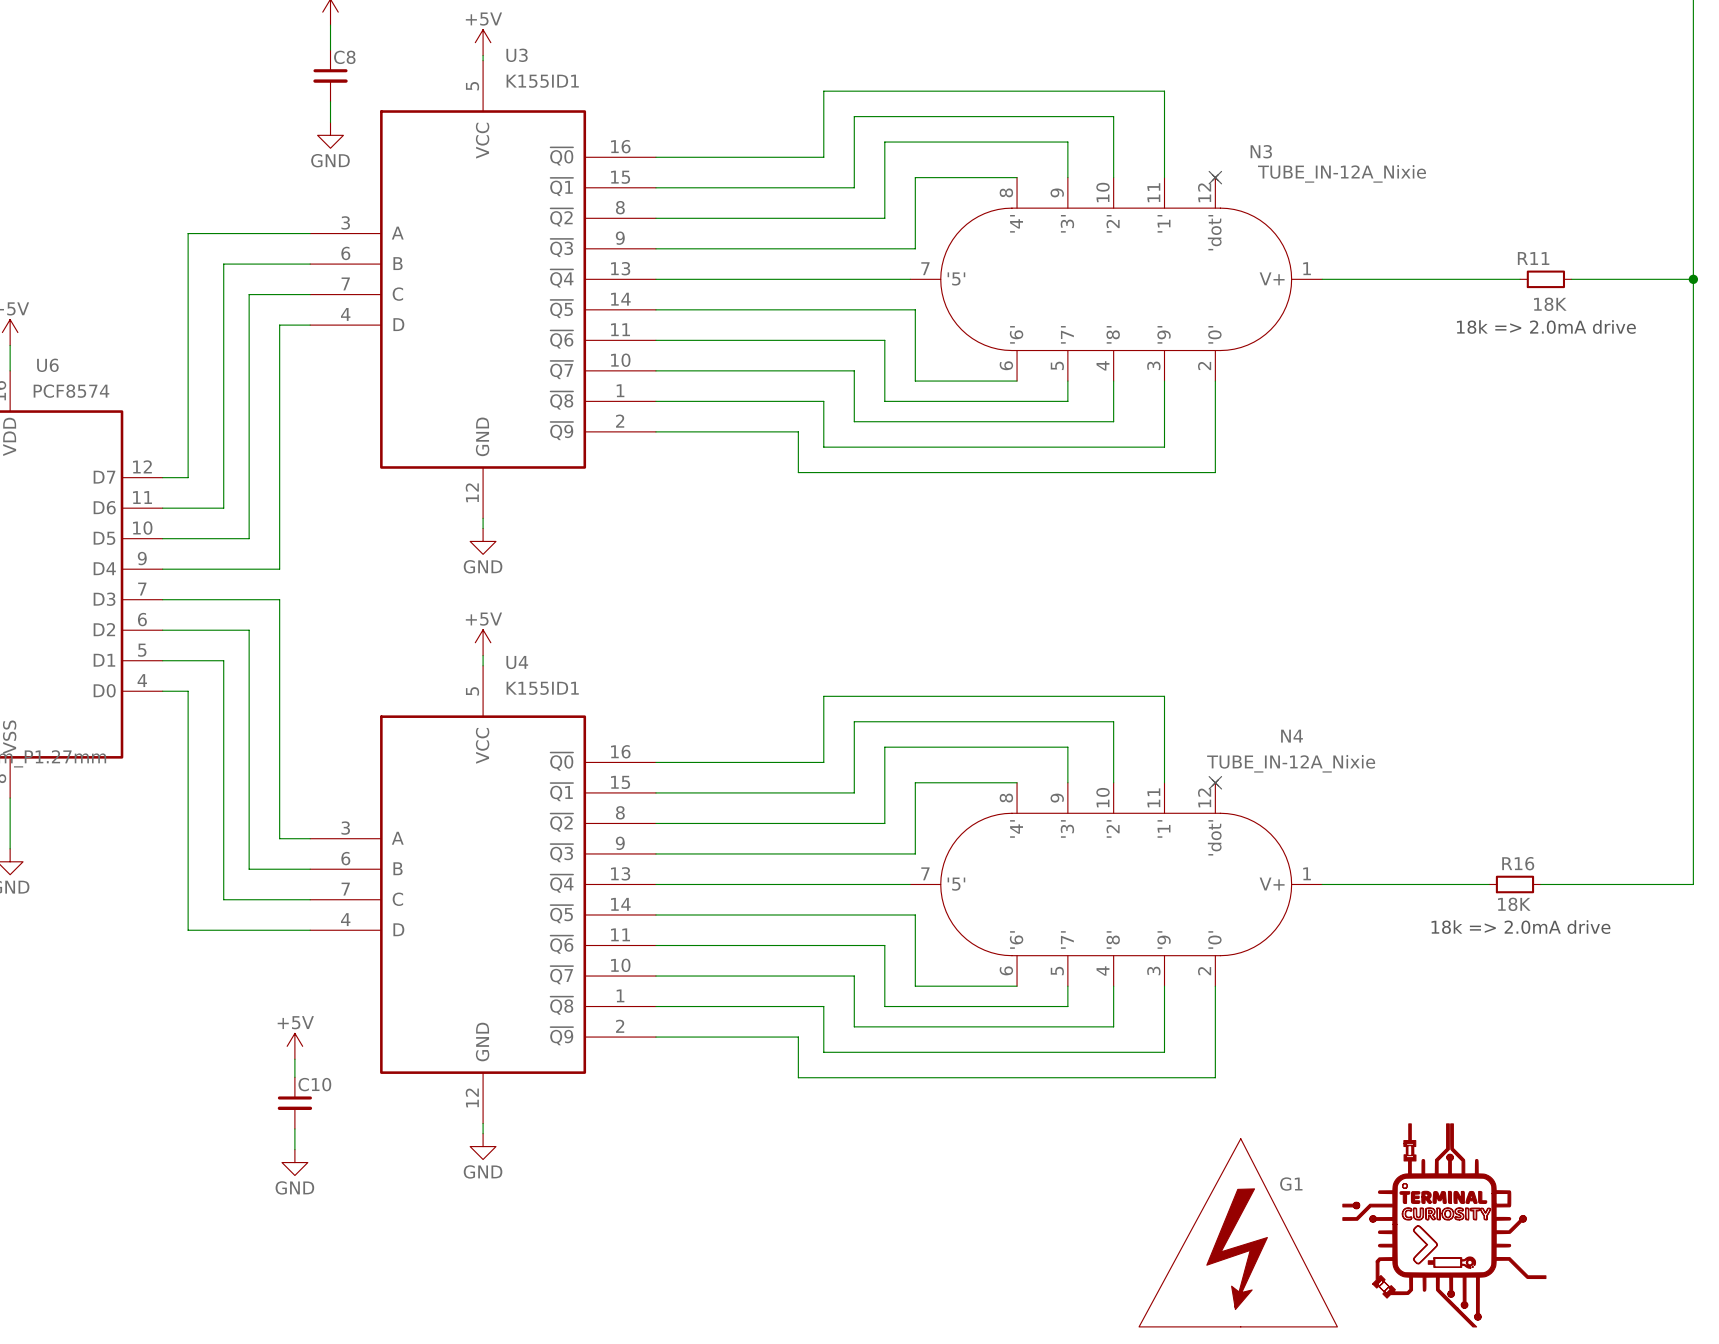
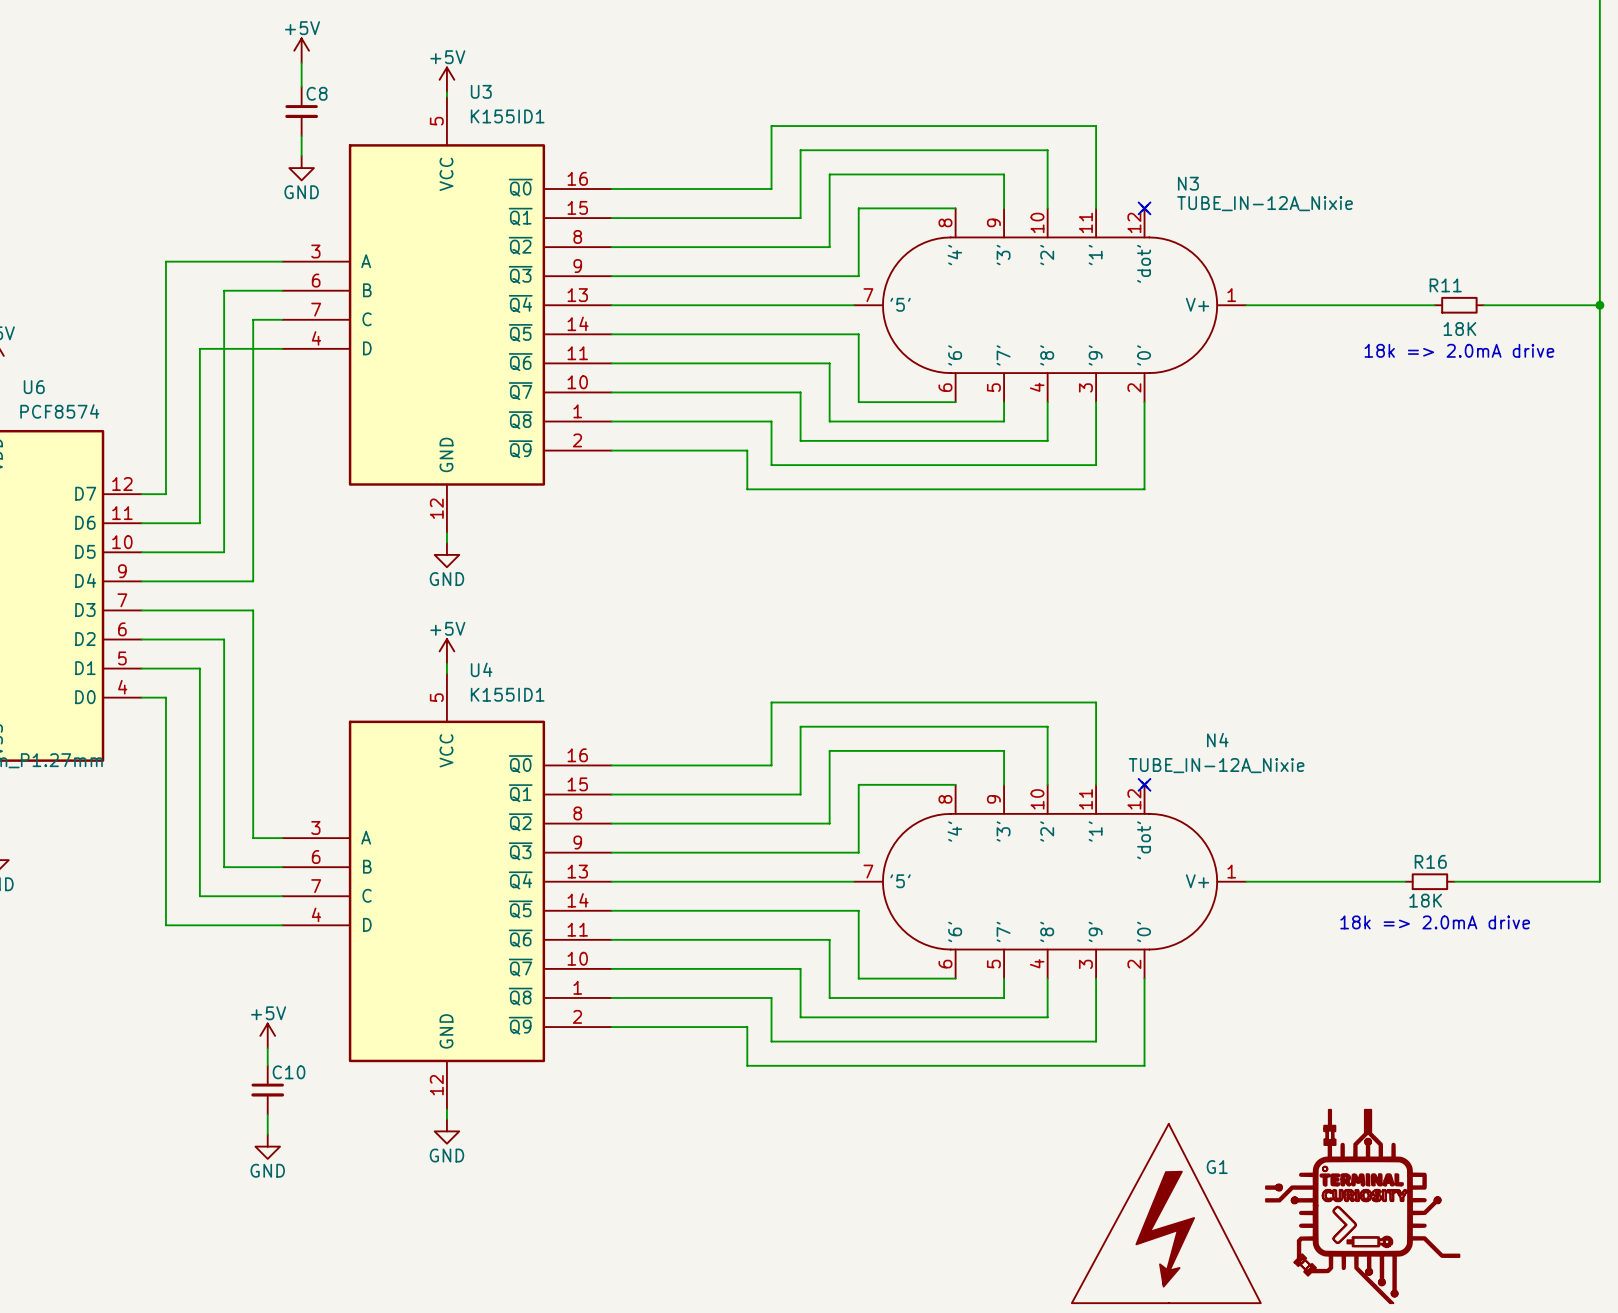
wire: (249, 264) (223, 264) (223, 325) -> (224, 290) (224, 319)
wire: (249, 294) (279, 294) -> (199, 348) (253, 348) (253, 319)

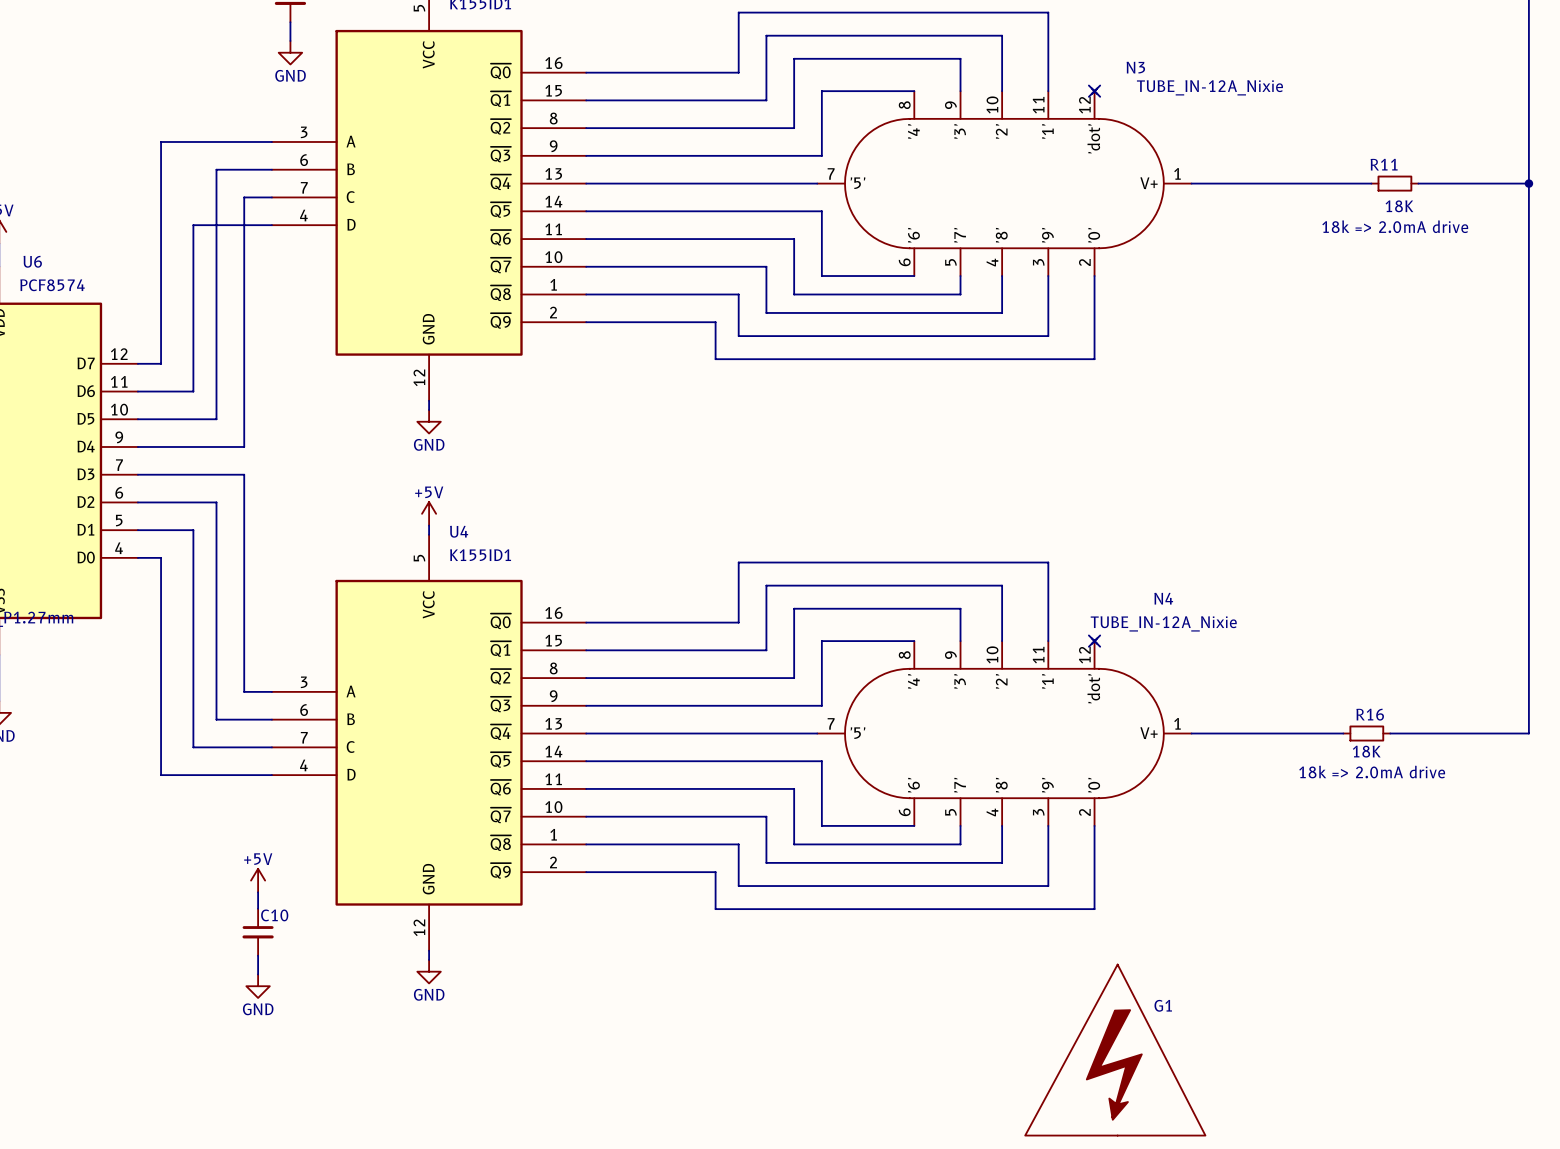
part: (1362, 1206) -> none

